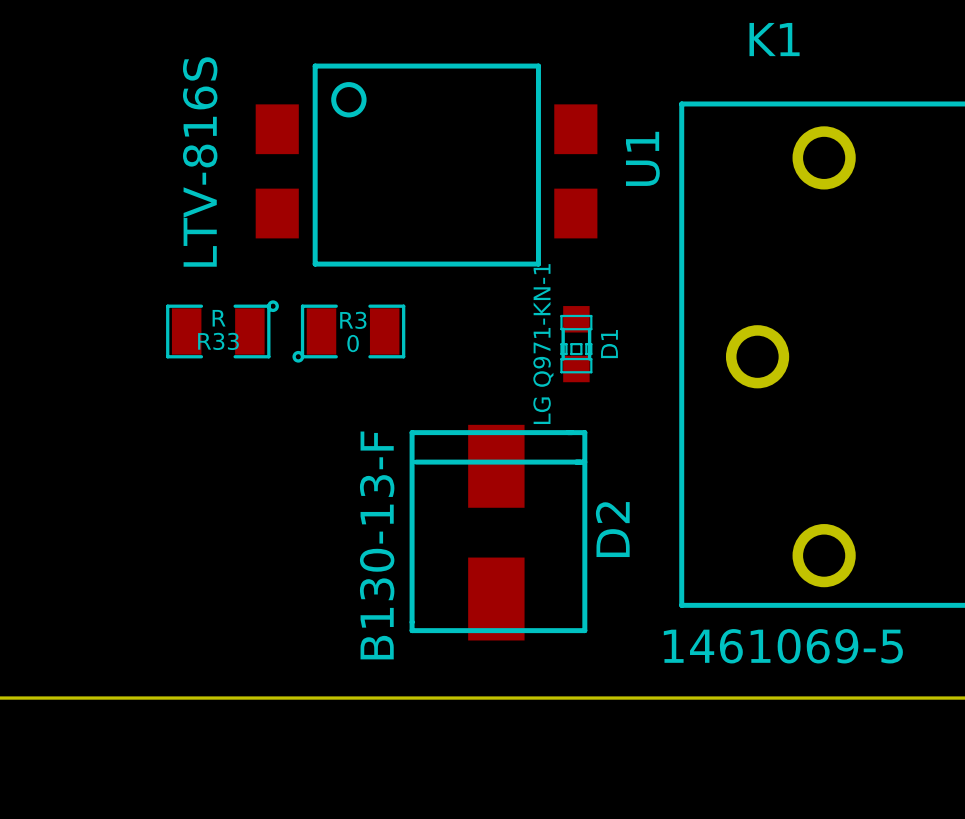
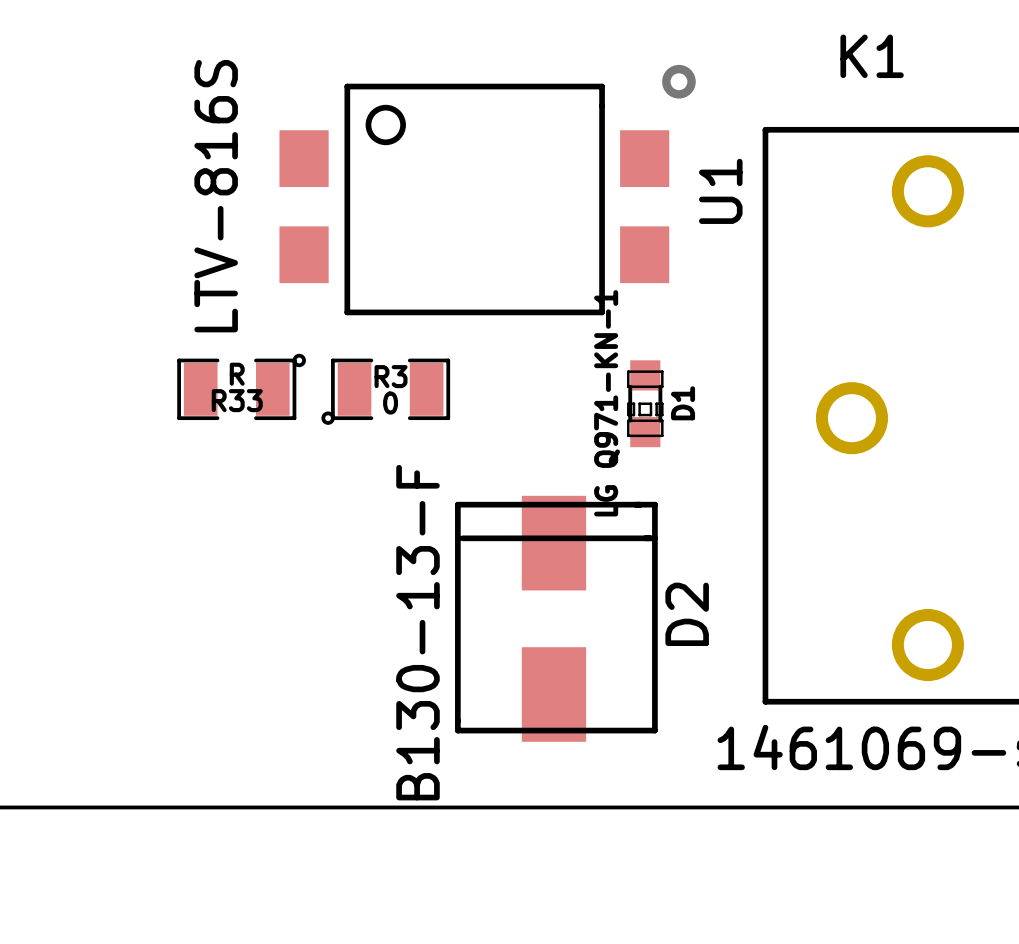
via: none -> (678, 81)

